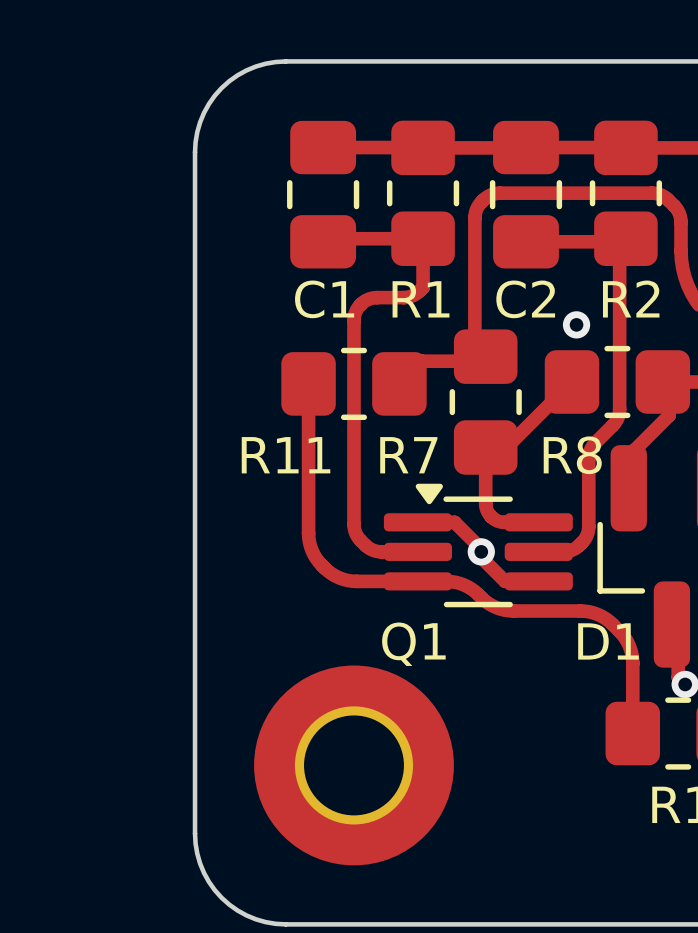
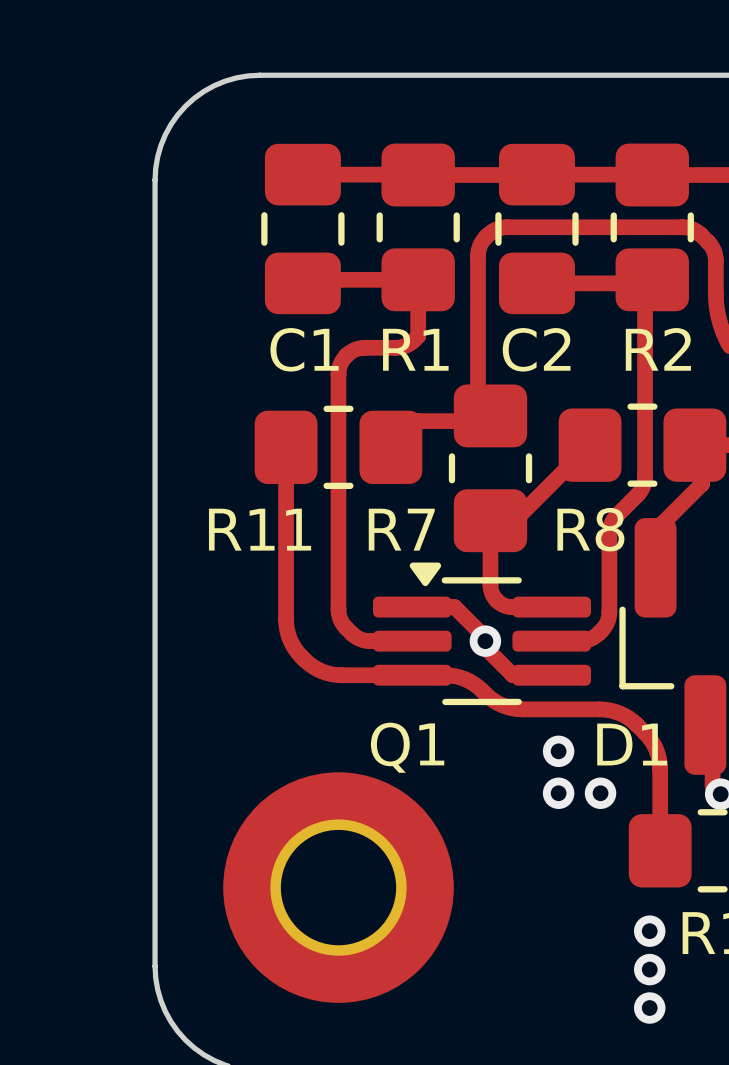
via: (576, 324) -> none
via: none -> (558, 751)
via: none -> (558, 793)
via: none -> (600, 793)
via: none -> (649, 931)
via: none -> (649, 969)
via: none -> (649, 1008)

